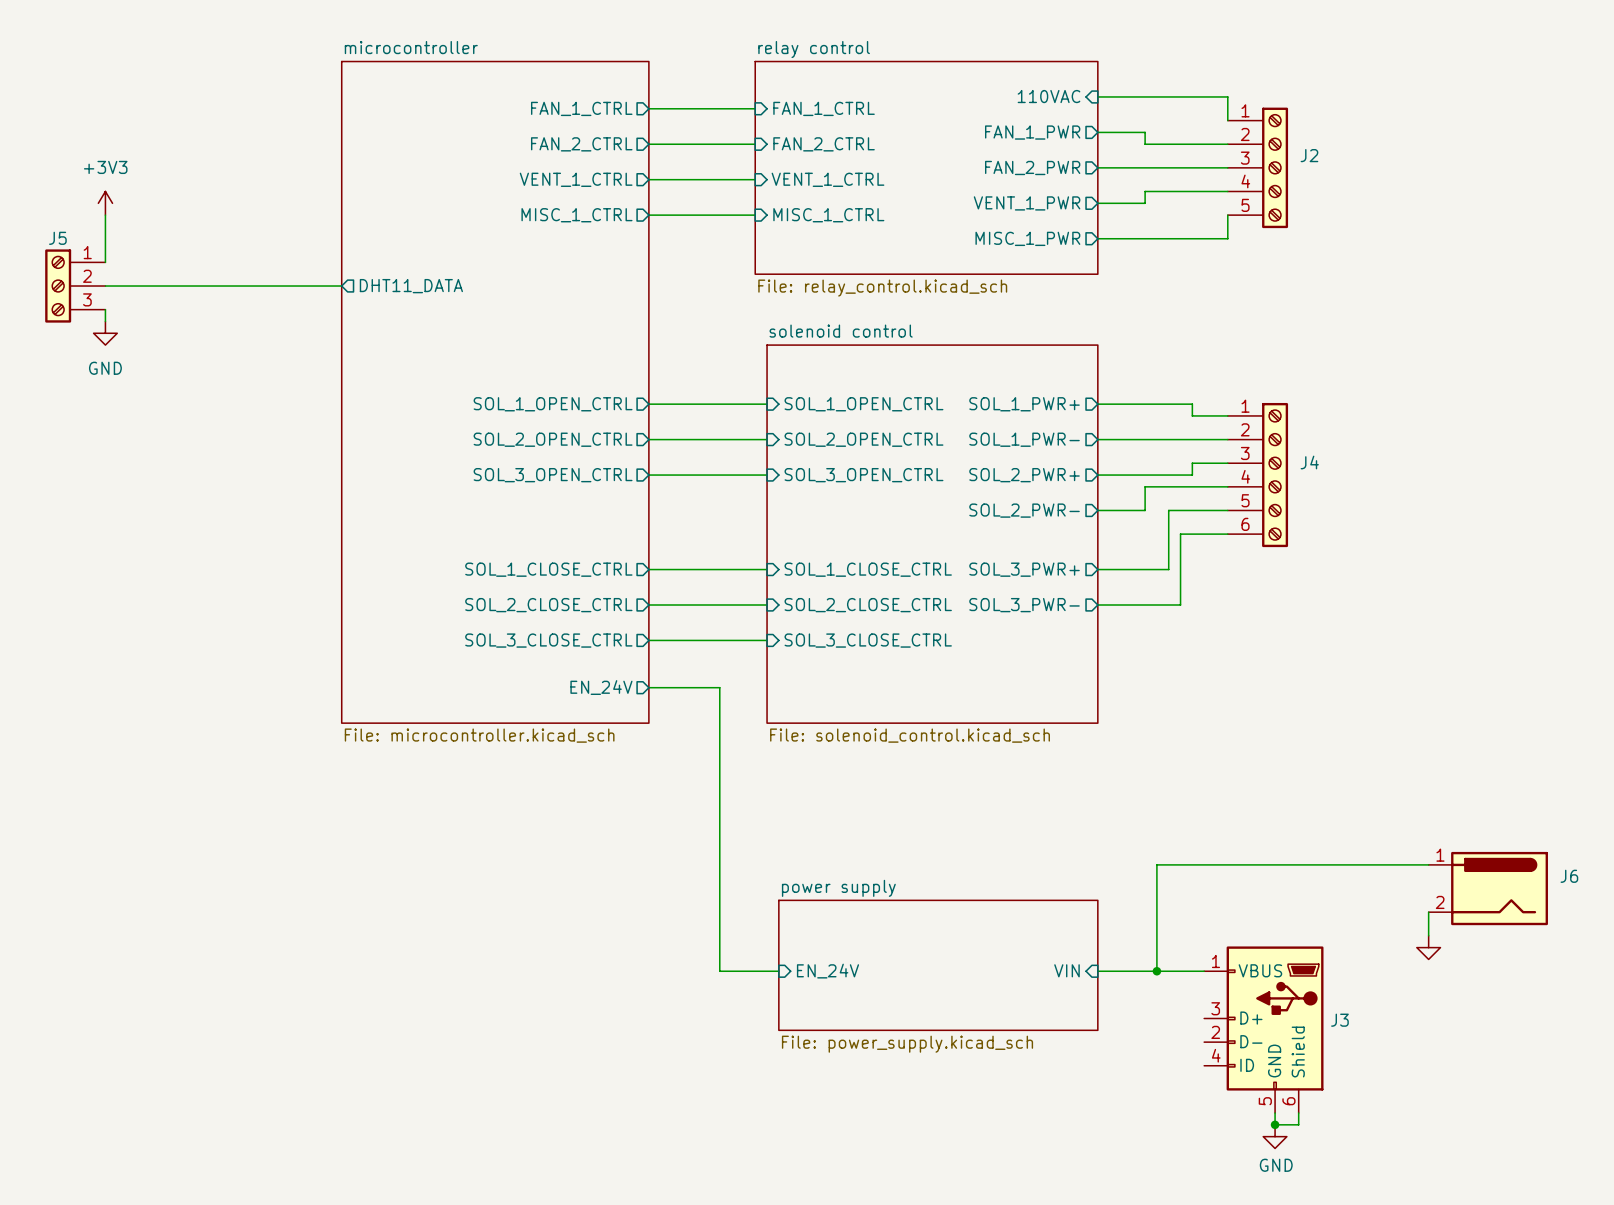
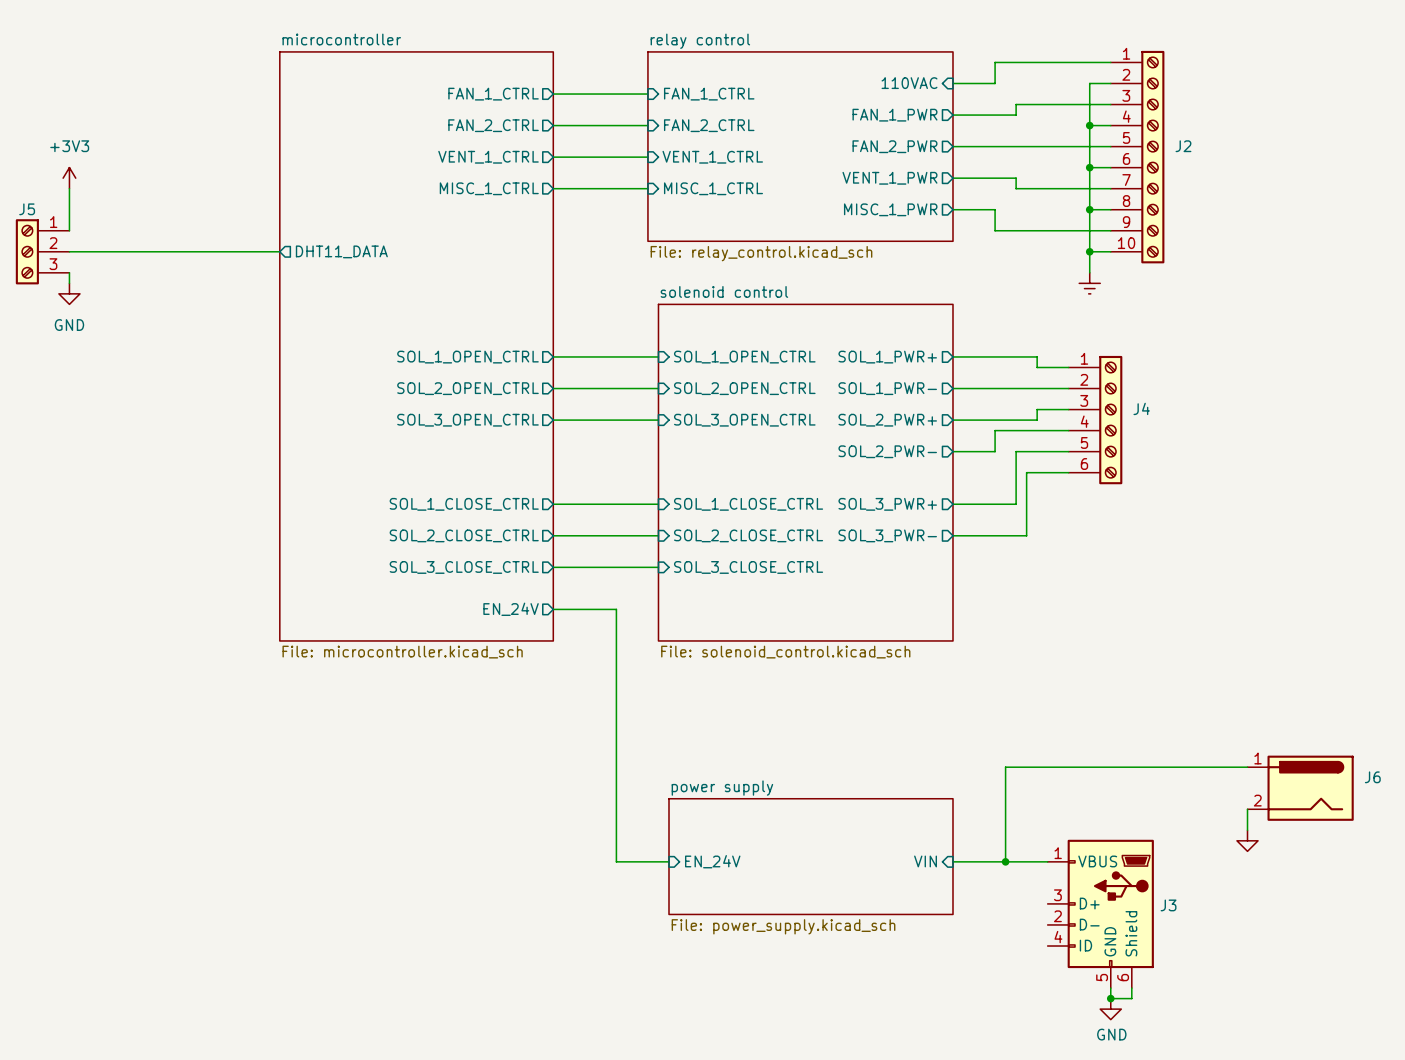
wire: (1145, 96) (1227, 96) (1227, 120) -> (995, 83) (995, 62) (1110, 62)
wire: none -> (1110, 83) (1089, 83) (1089, 272)
J2 symbol: [1227, 107, 1289, 229] -> [1110, 50, 1165, 264]
wire: (1145, 132) (1145, 144) (1227, 144) -> (995, 115) (1016, 115) (1016, 104) (1110, 104)
junction: none -> (1089, 125)
wire: (1227, 191) (1145, 191) (1145, 203) -> (1110, 188) (1016, 188) (1016, 178) (995, 178)
junction: none -> (1089, 167)
wire: (1227, 215) (1227, 238) (1145, 238) -> (1110, 230) (995, 230) (995, 209)
wire: none -> (1089, 209) (1110, 209)
junction: none -> (1089, 209)
wire: none -> (1089, 251) (1110, 251)
junction: none -> (1089, 251)
power symbol: none -> (1089, 283)

